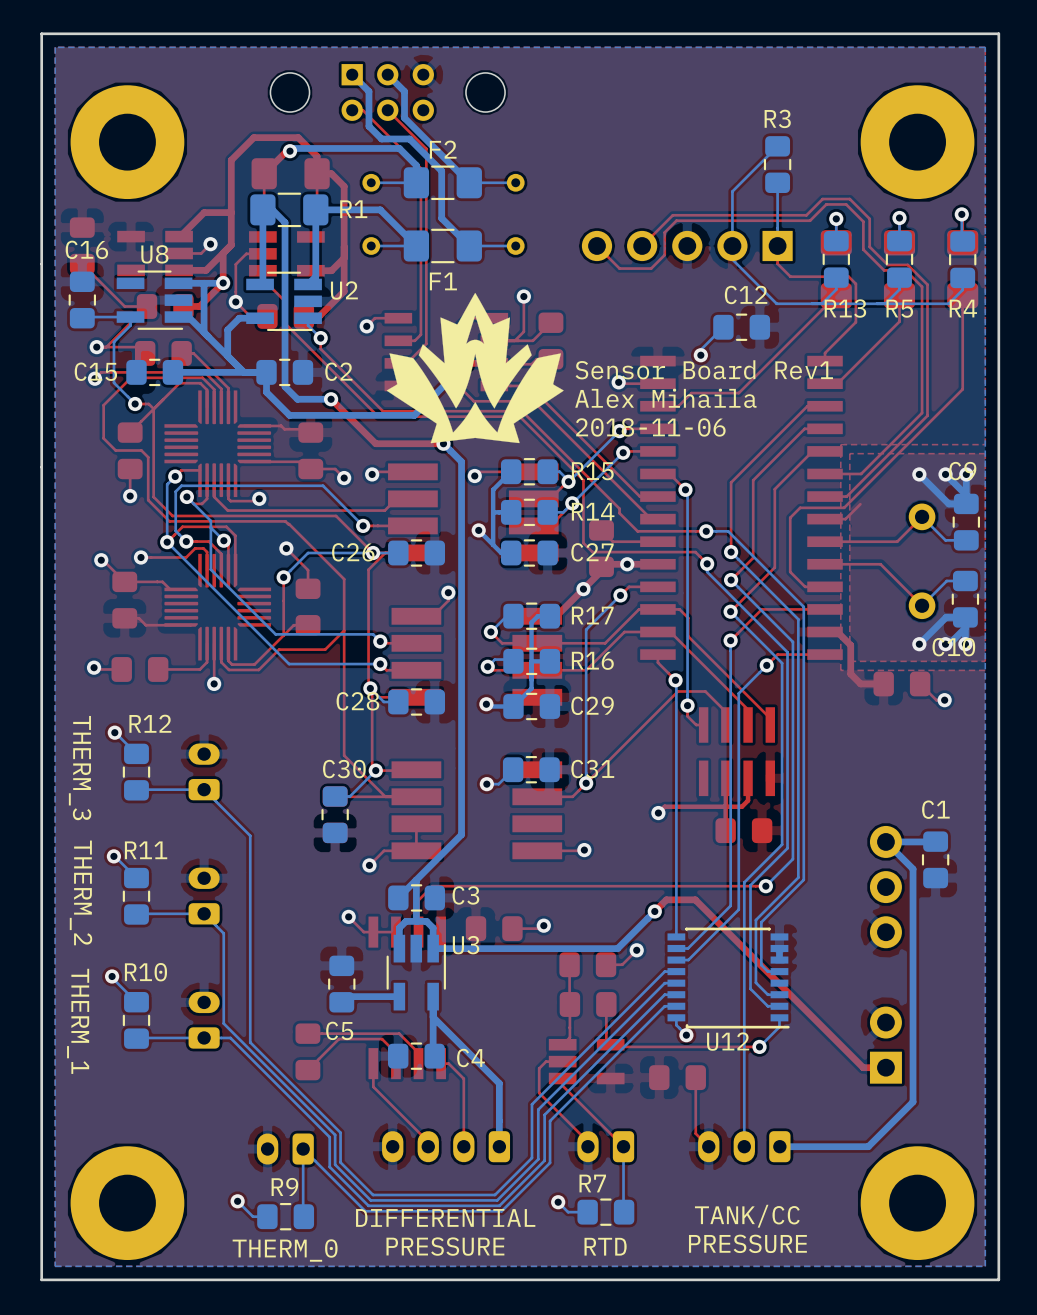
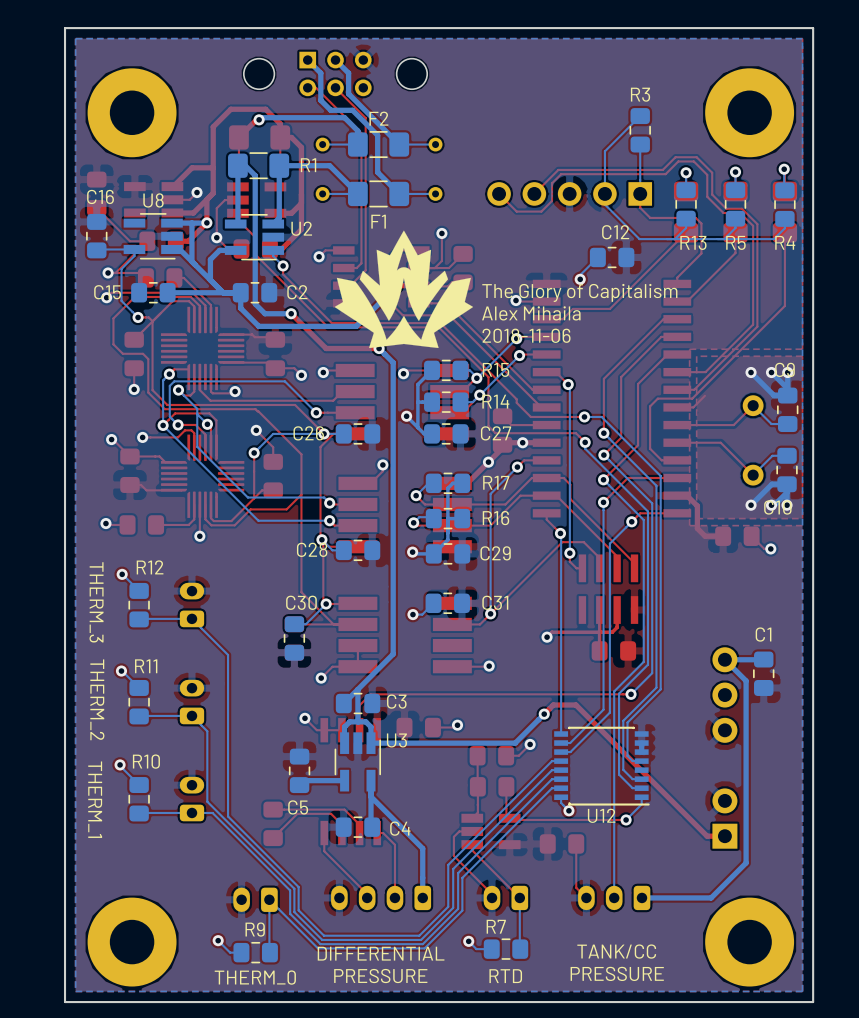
text: Sensor Board Rev1 (704, 369) -> The Glory of Capitalism (579, 292)

